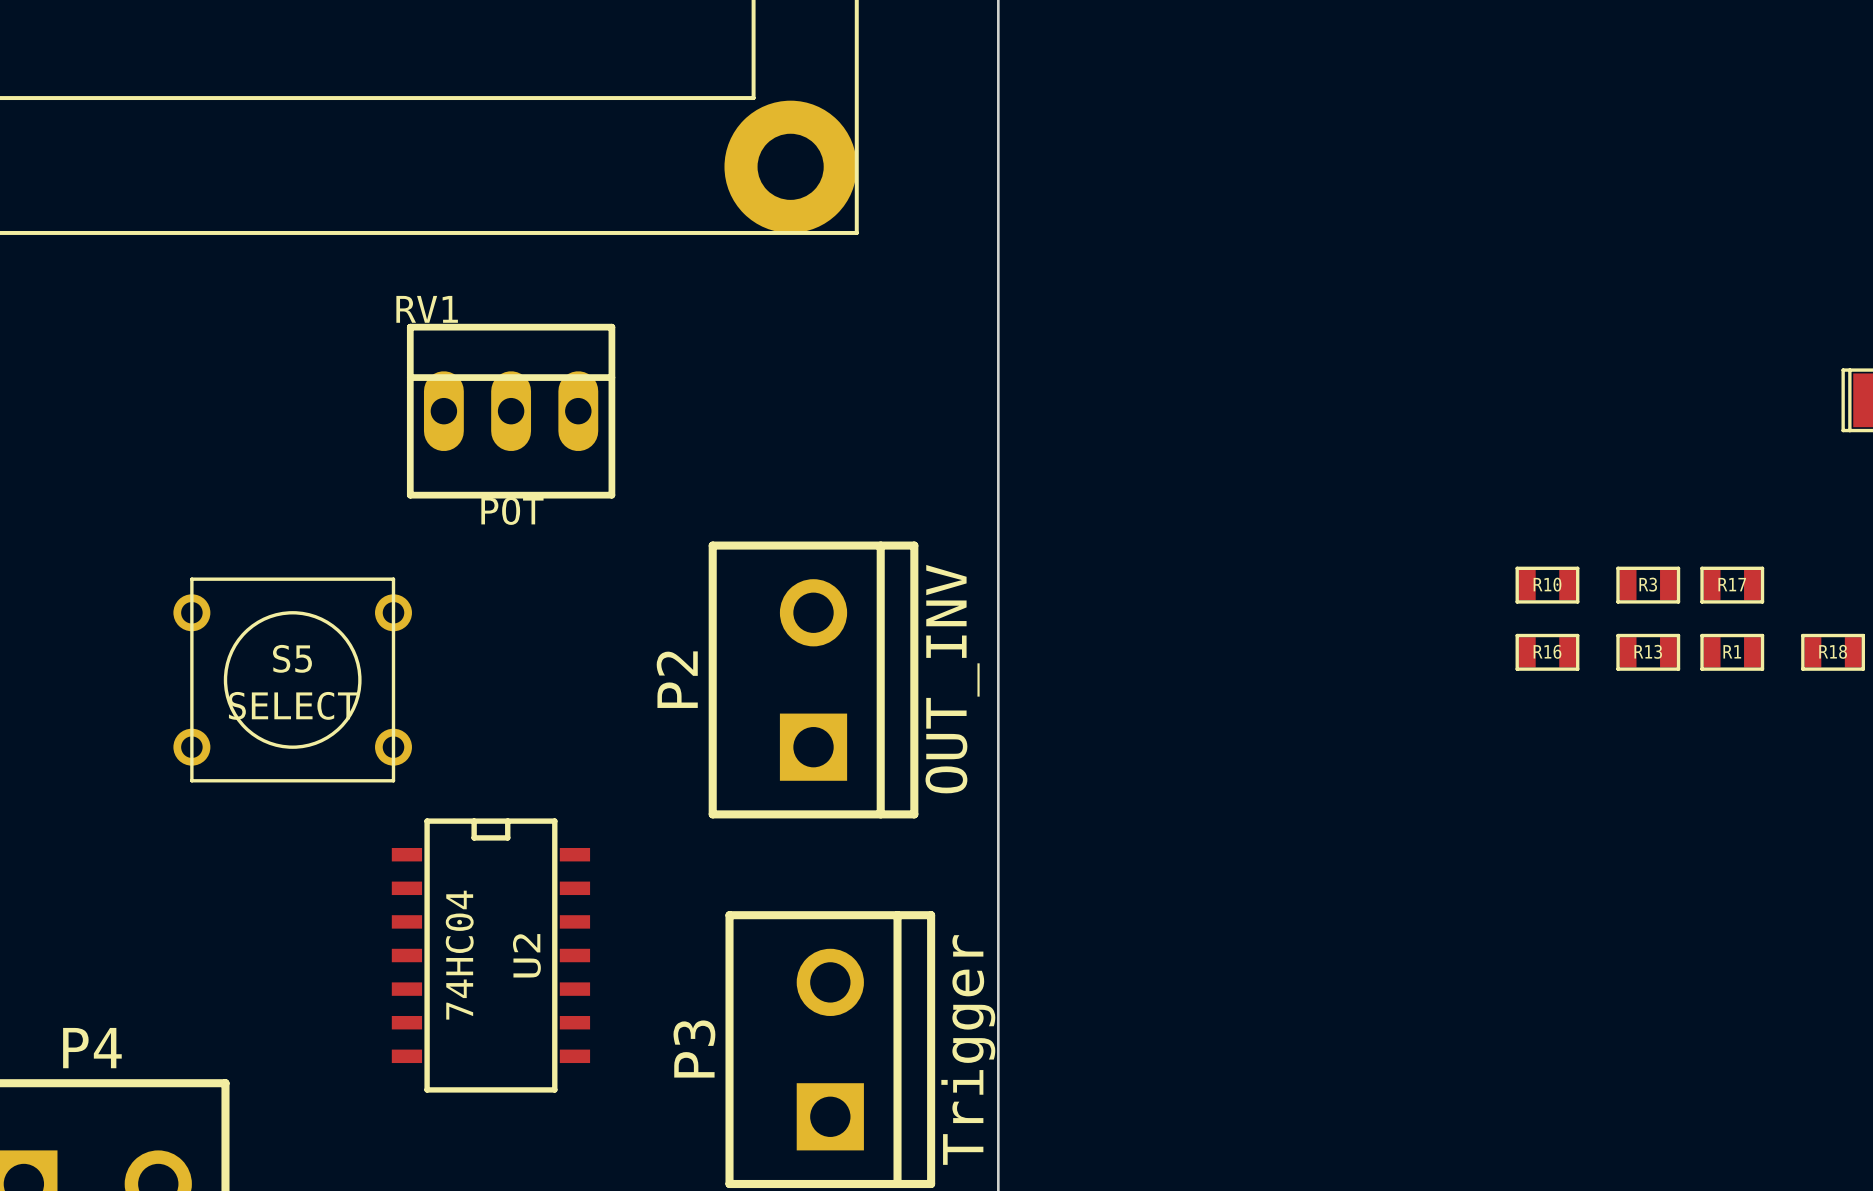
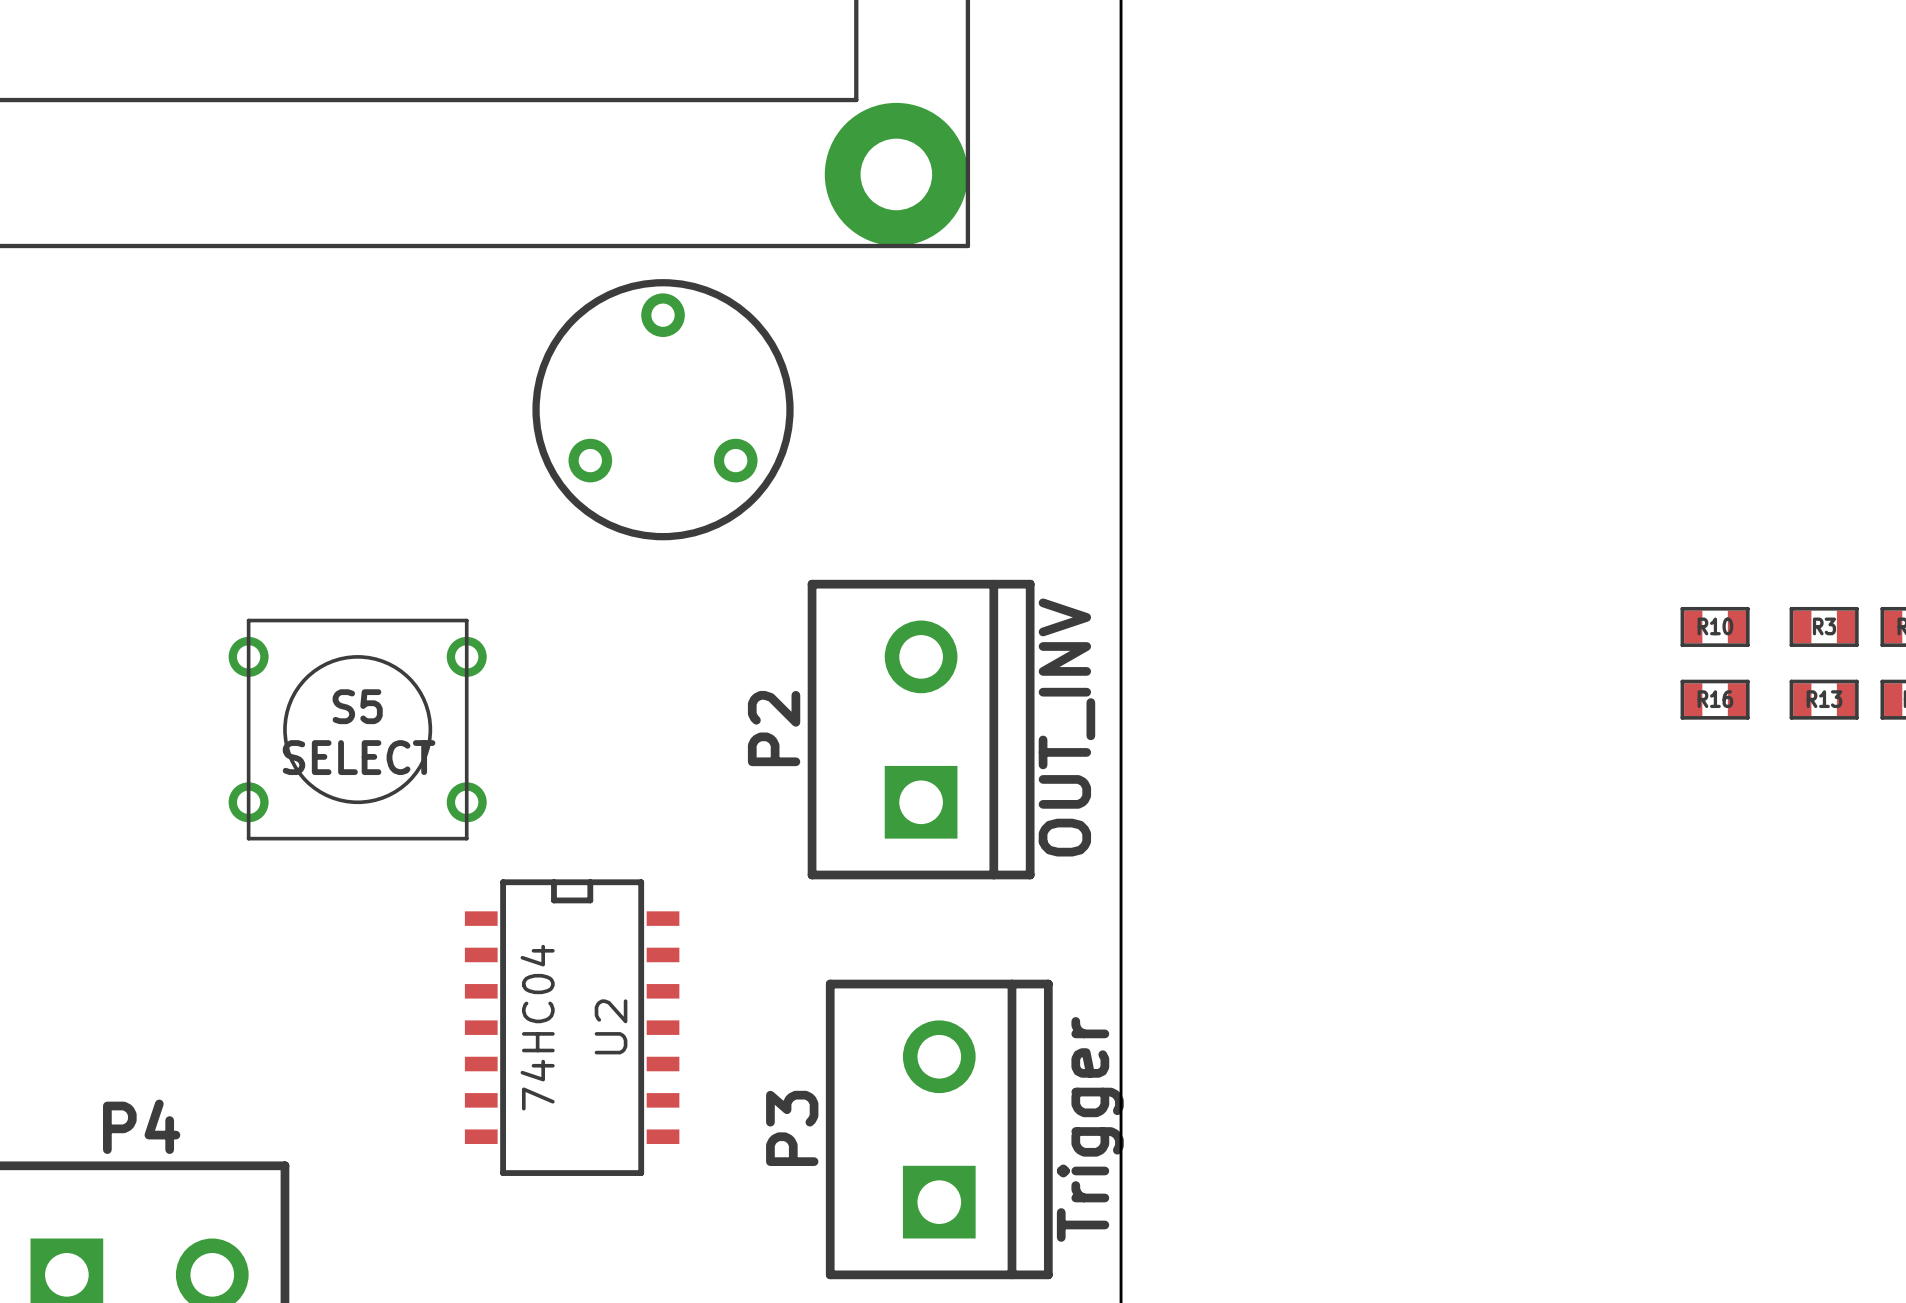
part: none -> (663, 409)
RV1: POT (511, 411) -> none

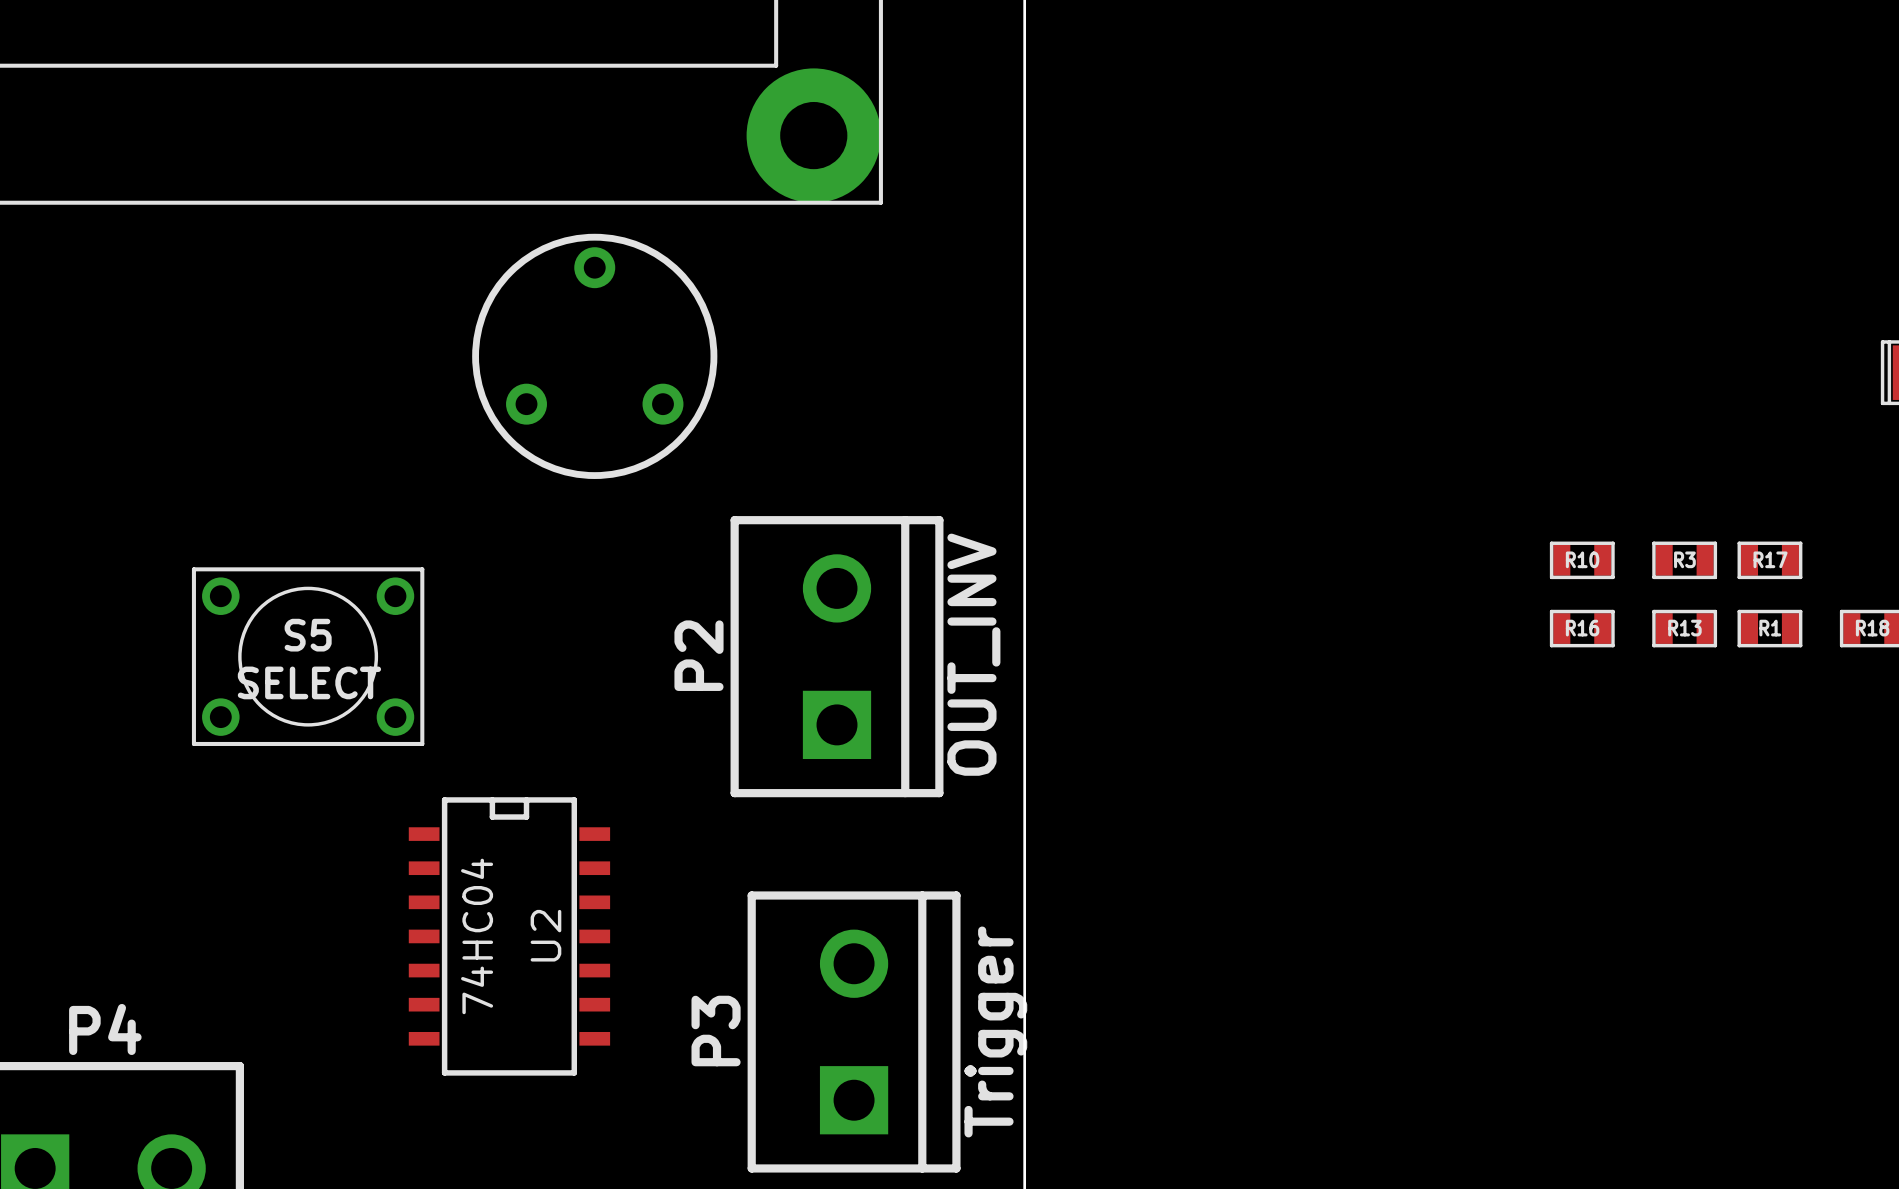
S5 footprint: [228, 618, 487, 841] -> [191, 567, 425, 746]

